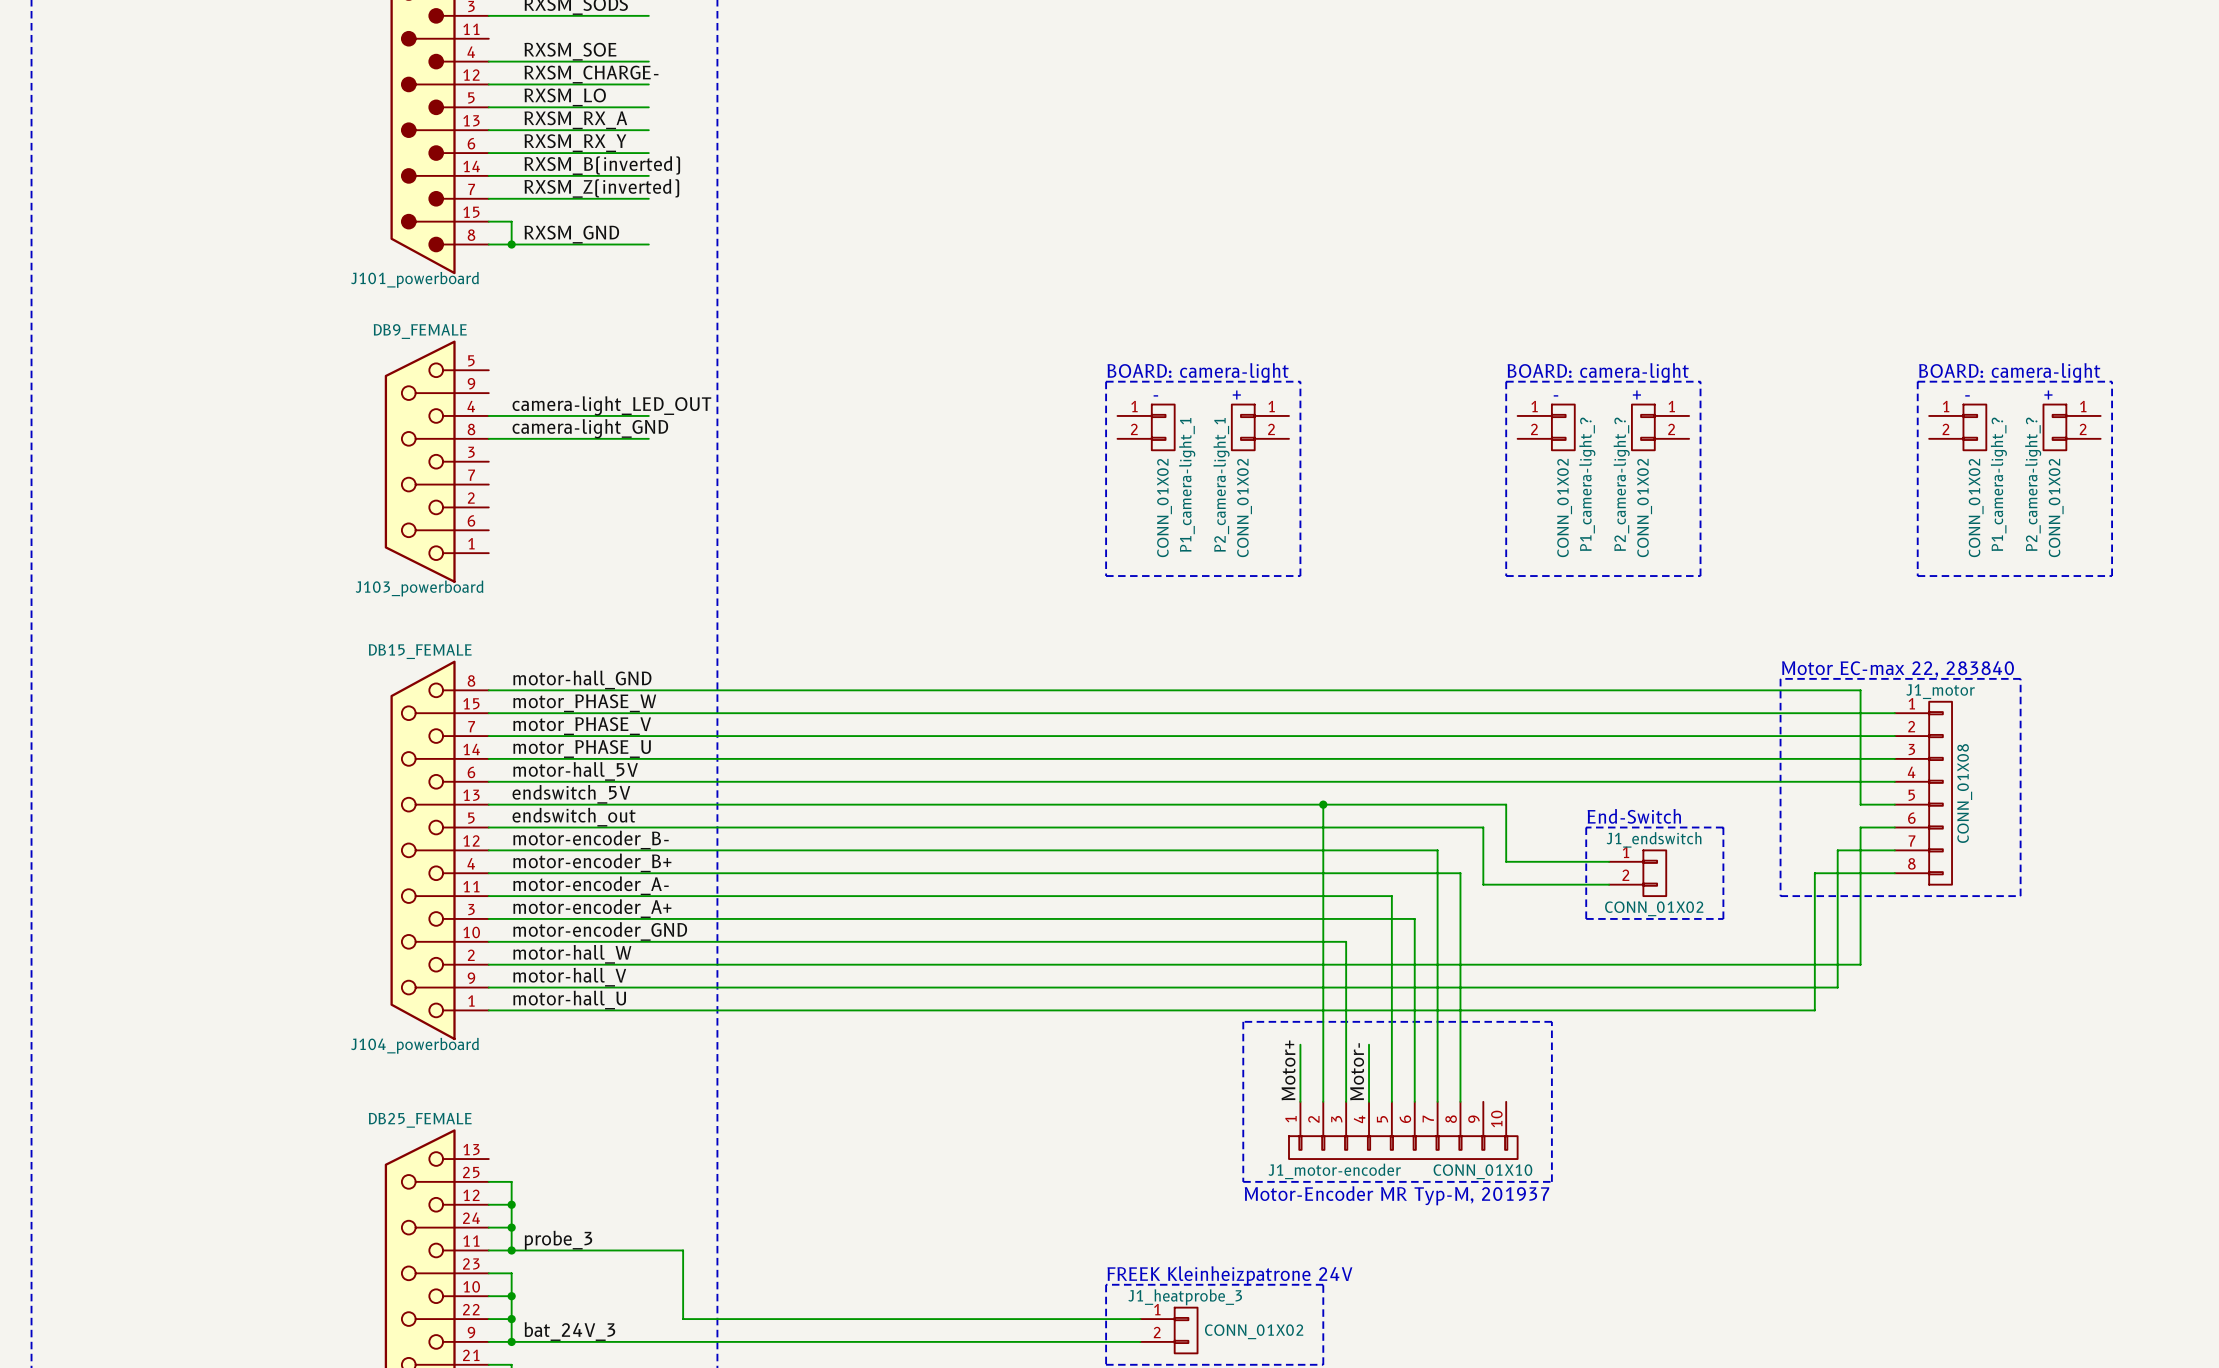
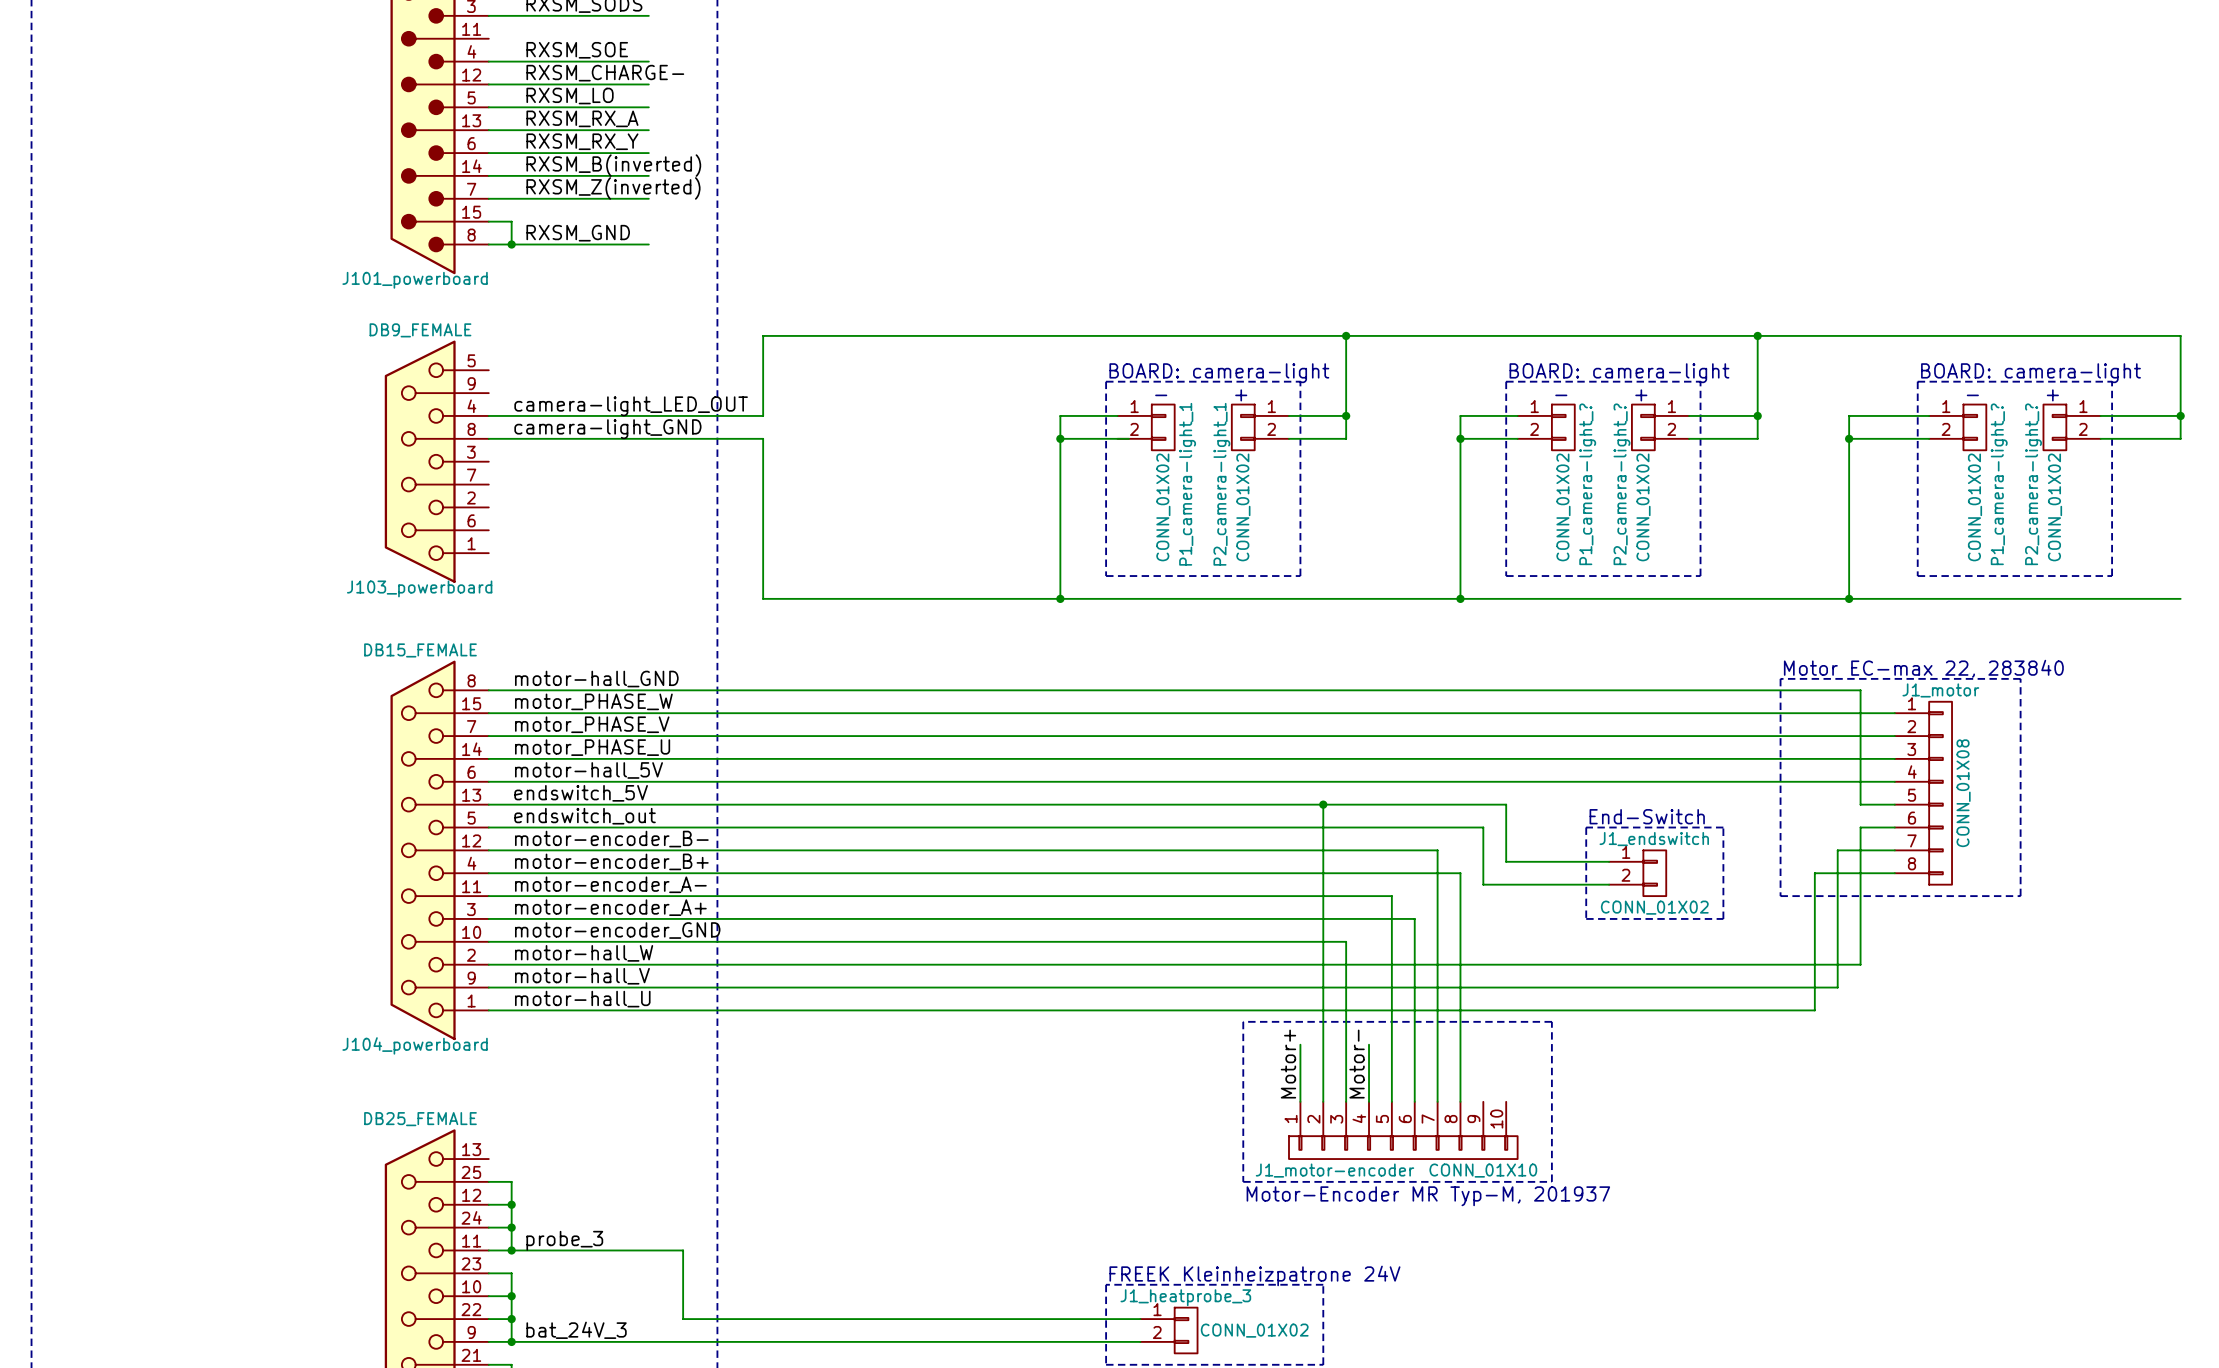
wire: none -> (1346, 335) (1346, 438) (1288, 438)
junction: none -> (1346, 335)
wire: none -> (1757, 335) (1757, 438) (1689, 438)
junction: none -> (1757, 335)
wire: none -> (648, 415) (763, 415) (763, 335) (2180, 335) (2180, 438) (2100, 438)
wire: none -> (1117, 415) (1060, 415) (1060, 598)
wire: none -> (1288, 415) (1346, 415)
junction: none -> (1346, 415)
wire: none -> (1517, 415) (1460, 415) (1460, 598)
wire: none -> (1689, 415) (1757, 415)
junction: none -> (1757, 415)
wire: none -> (1929, 415) (1849, 415) (1849, 598)
wire: none -> (2100, 415) (2180, 415)
junction: none -> (2180, 415)
wire: none -> (648, 438) (763, 438) (763, 598) (2180, 598)
wire: none -> (1060, 438) (1128, 438)
junction: none -> (1060, 438)
wire: none -> (1460, 438) (1517, 438)
junction: none -> (1460, 438)
wire: none -> (1849, 438) (1929, 438)
junction: none -> (1849, 438)
junction: none -> (1060, 598)
junction: none -> (1460, 598)
junction: none -> (1849, 598)

